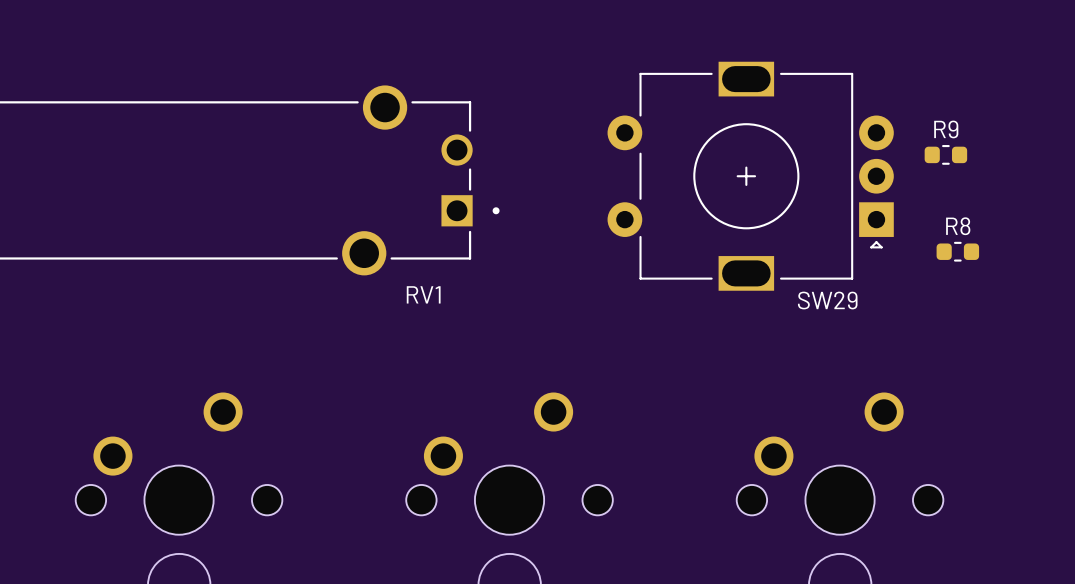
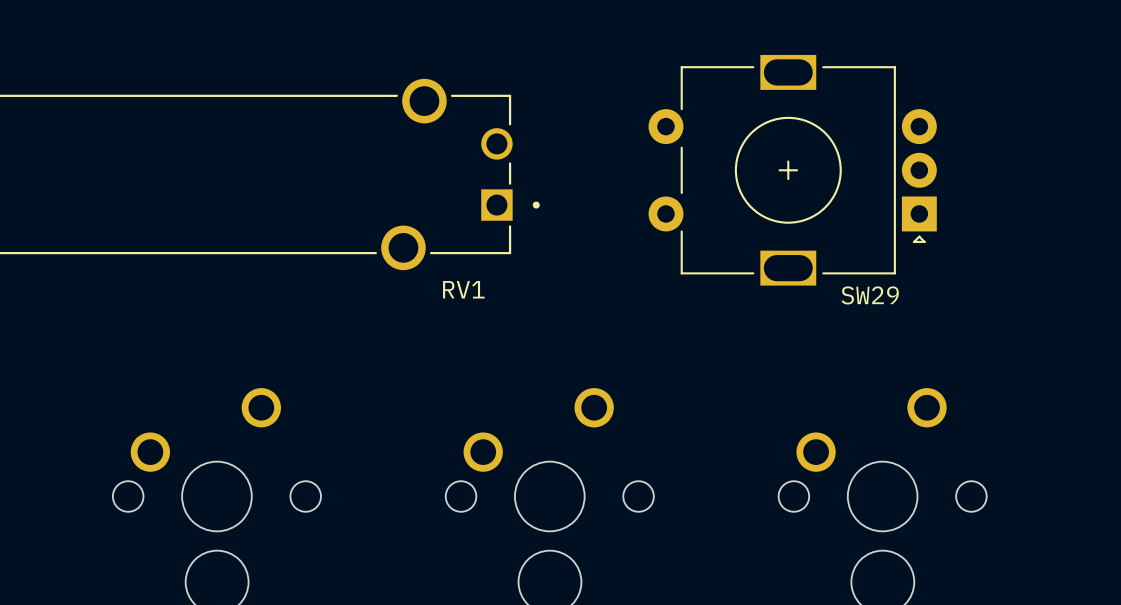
R9: (945, 154) -> none
R8: (957, 251) -> none

